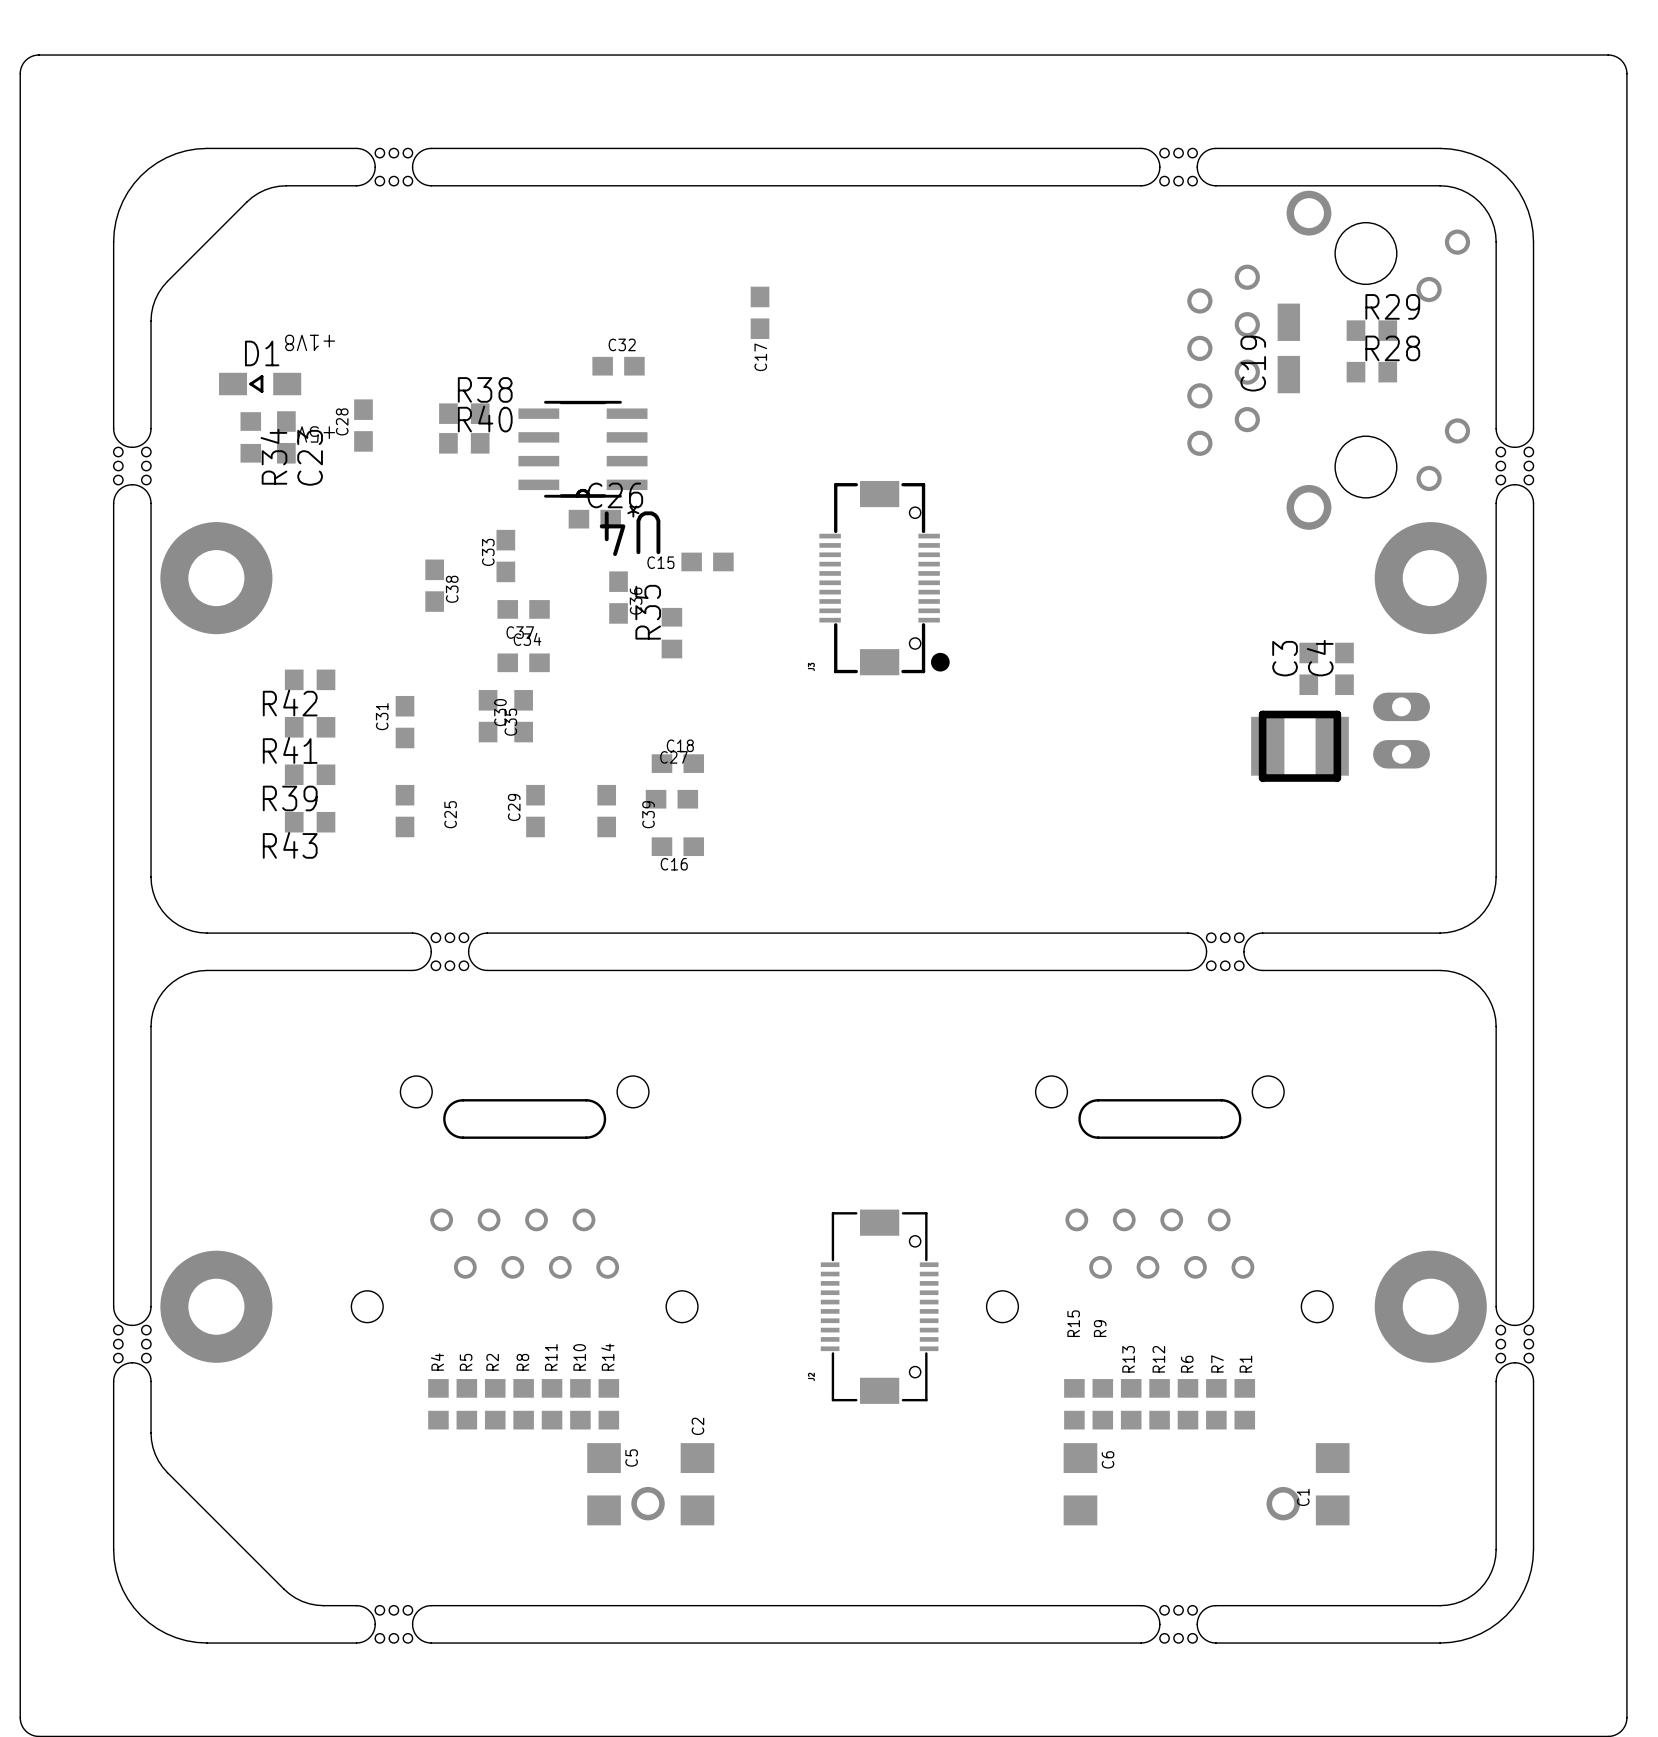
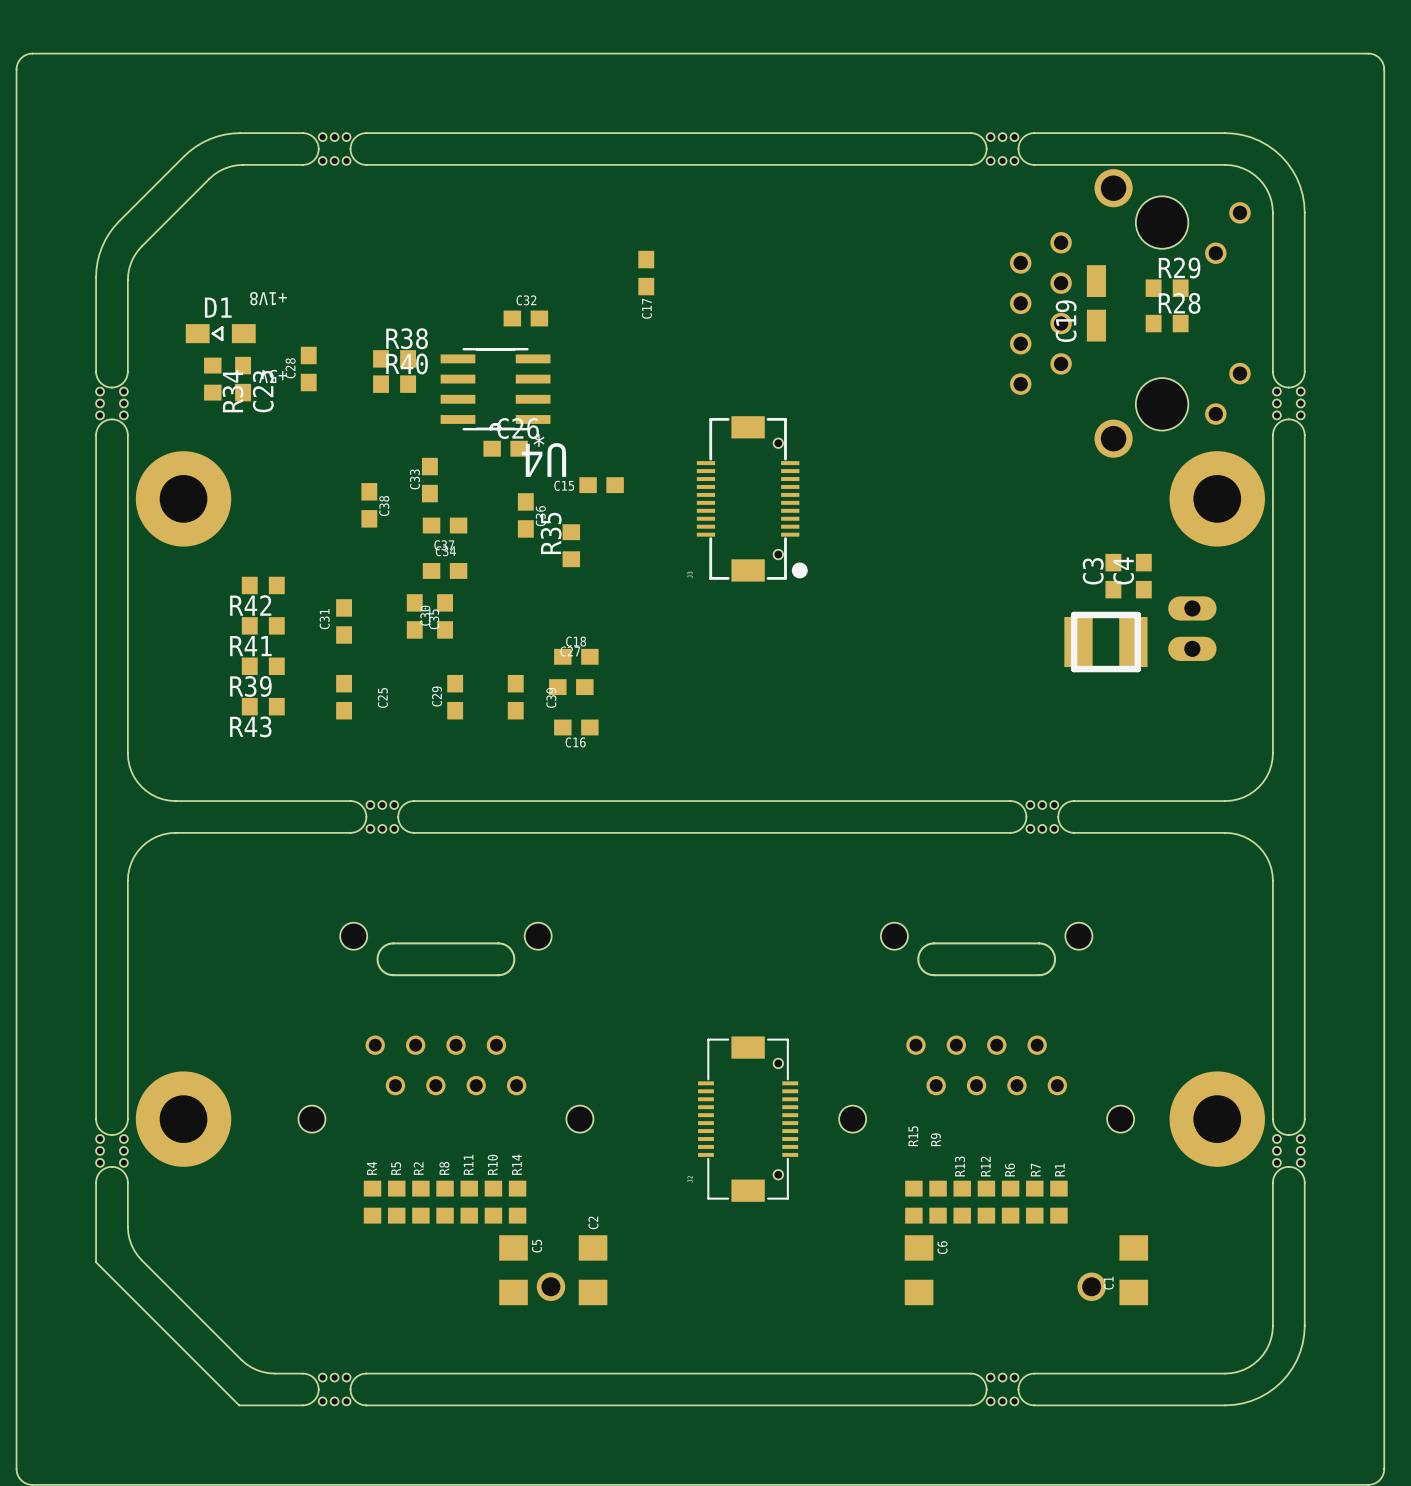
board edge: (283, 148) (207, 148) (186, 150) (157, 162) (141, 175) (127, 192) (115, 221) (113, 241) (113, 317) -> (240, 133) (224, 134) (209, 139) (196, 146) (184, 156) (109, 233) (99, 254) (96, 277)
board edge: (113, 1474) (113, 1549) (115, 1570) (127, 1599) (141, 1615) (157, 1628) (186, 1640) (207, 1643) (281, 1643) -> (96, 1262) (239, 1405)

